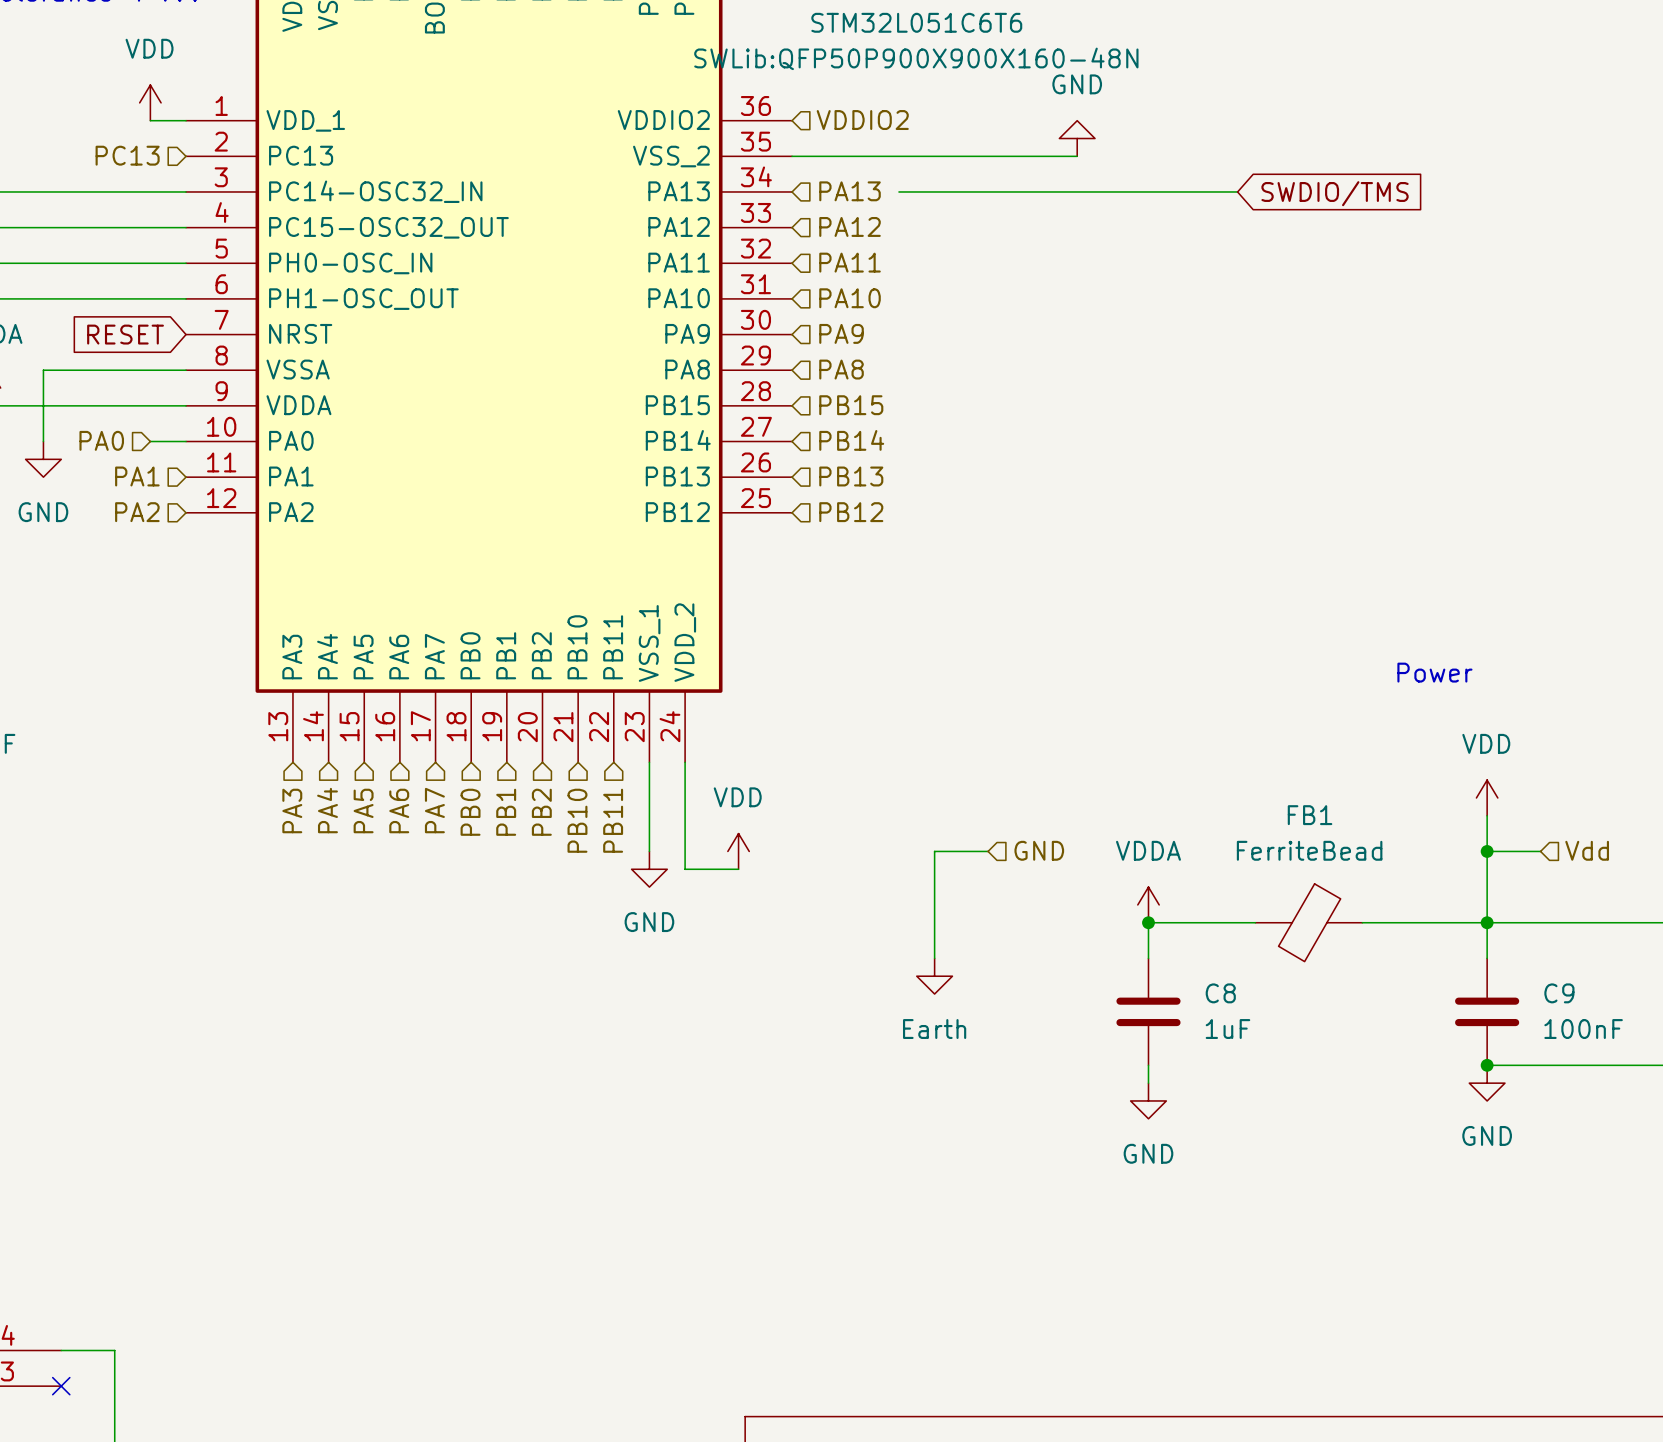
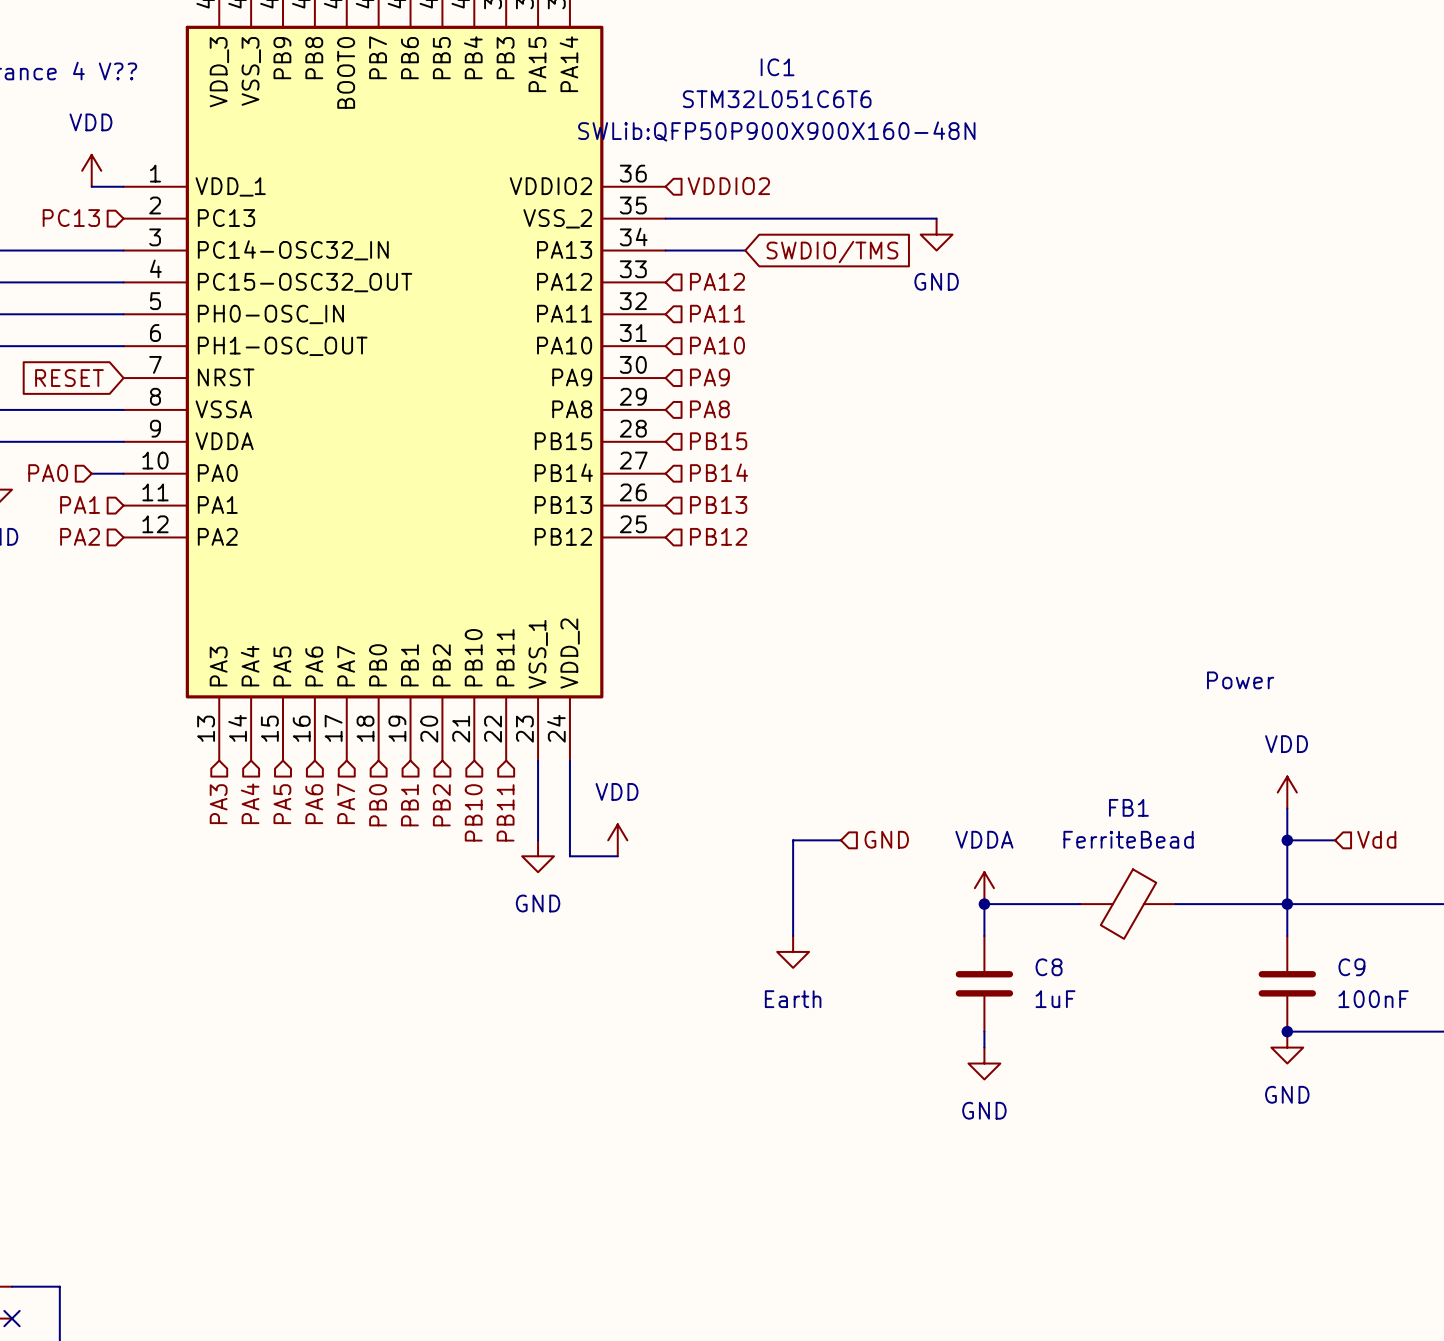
power symbol rotation: 0° (1077, 138) -> 180° (936, 234)
power symbol position: GND (1077, 138) -> GND (936, 234)
wire: none -> (920, 218) (936, 218)
wire: none -> (665, 250) (745, 250)
hierarchical label: PA13 (850, 191) -> none
wire: (898, 191) (1237, 191) -> none
global label: none -> SWDIO/TMS (832, 252)
global label: SWDIO/TMS (1335, 193) -> none

